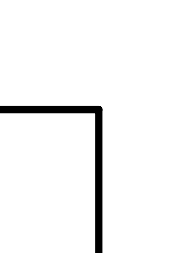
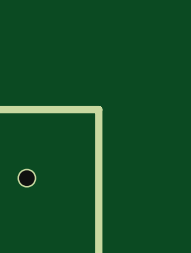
hole: none -> (26, 178)

